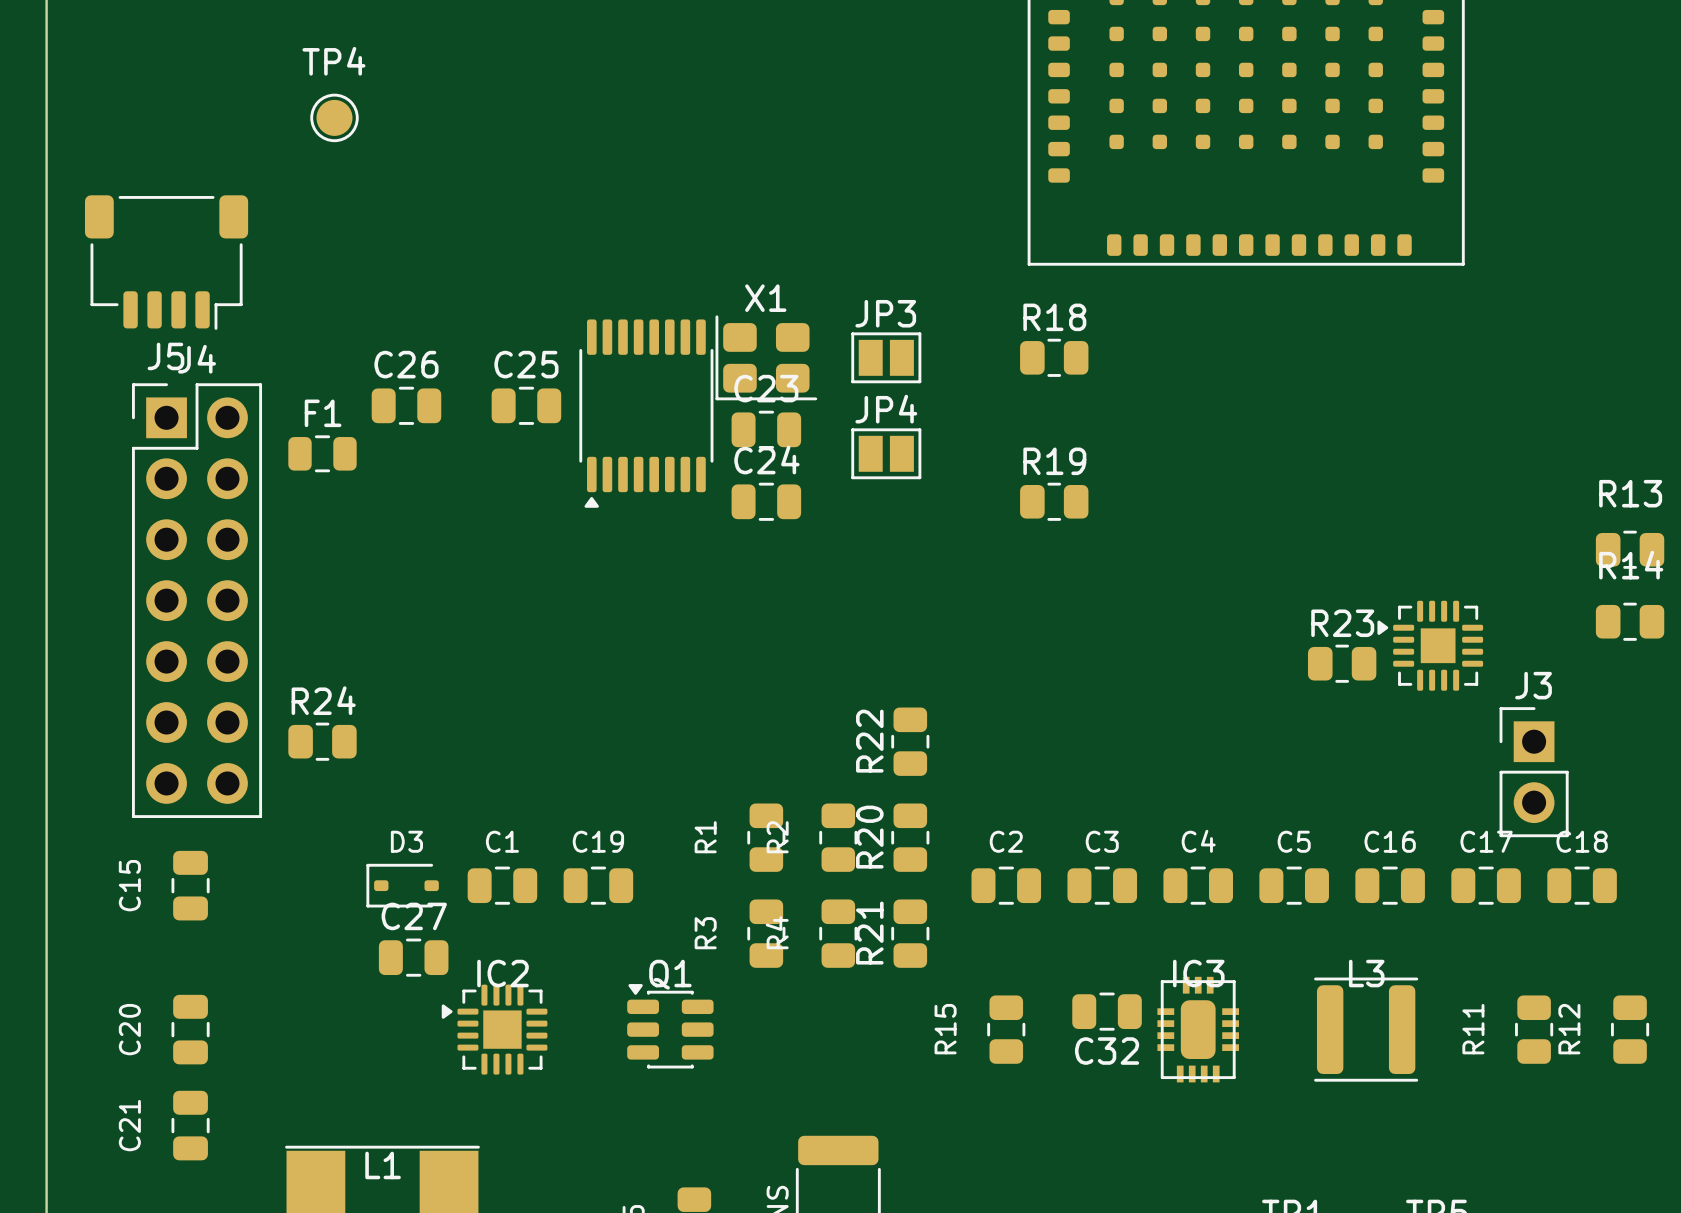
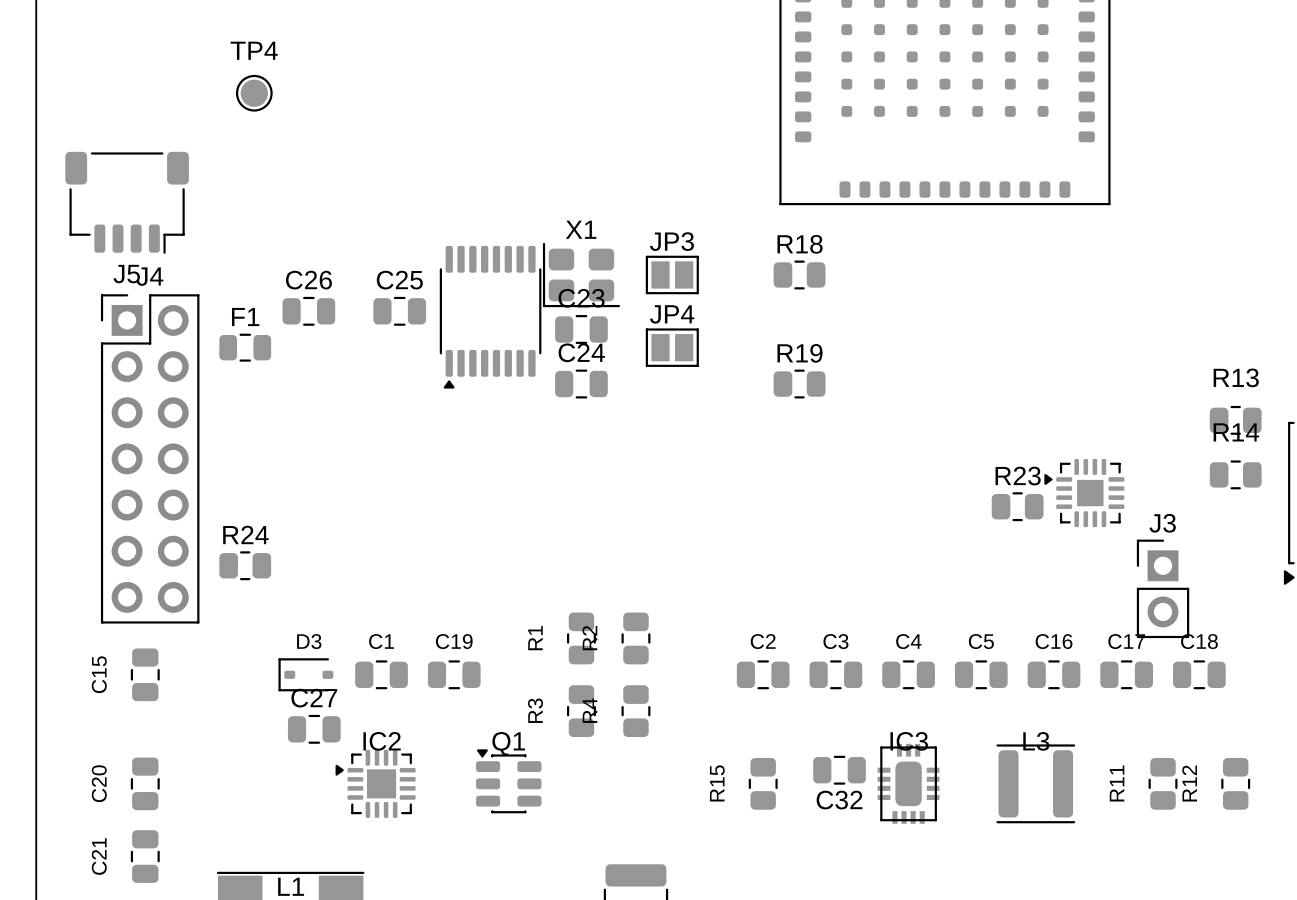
R22: (910, 741) -> none
R20: (910, 837) -> none
R21: (910, 933) -> none

